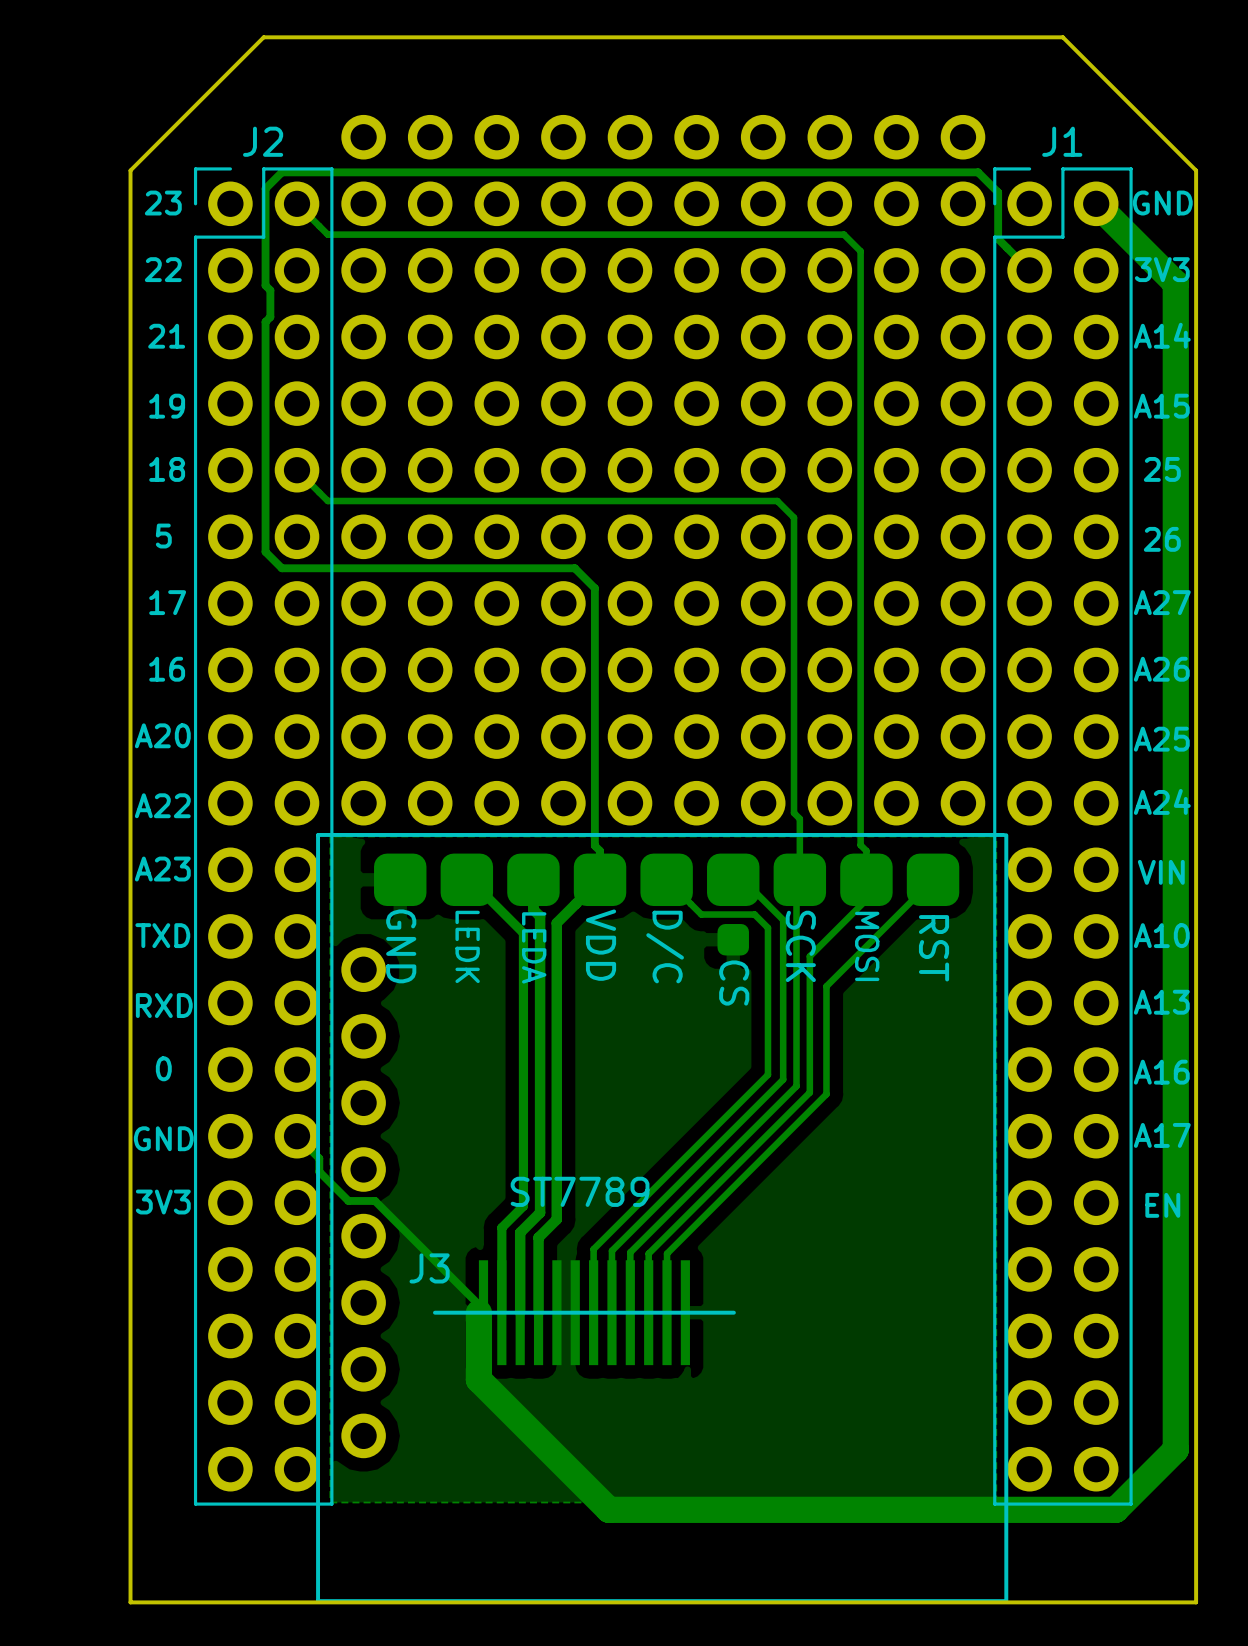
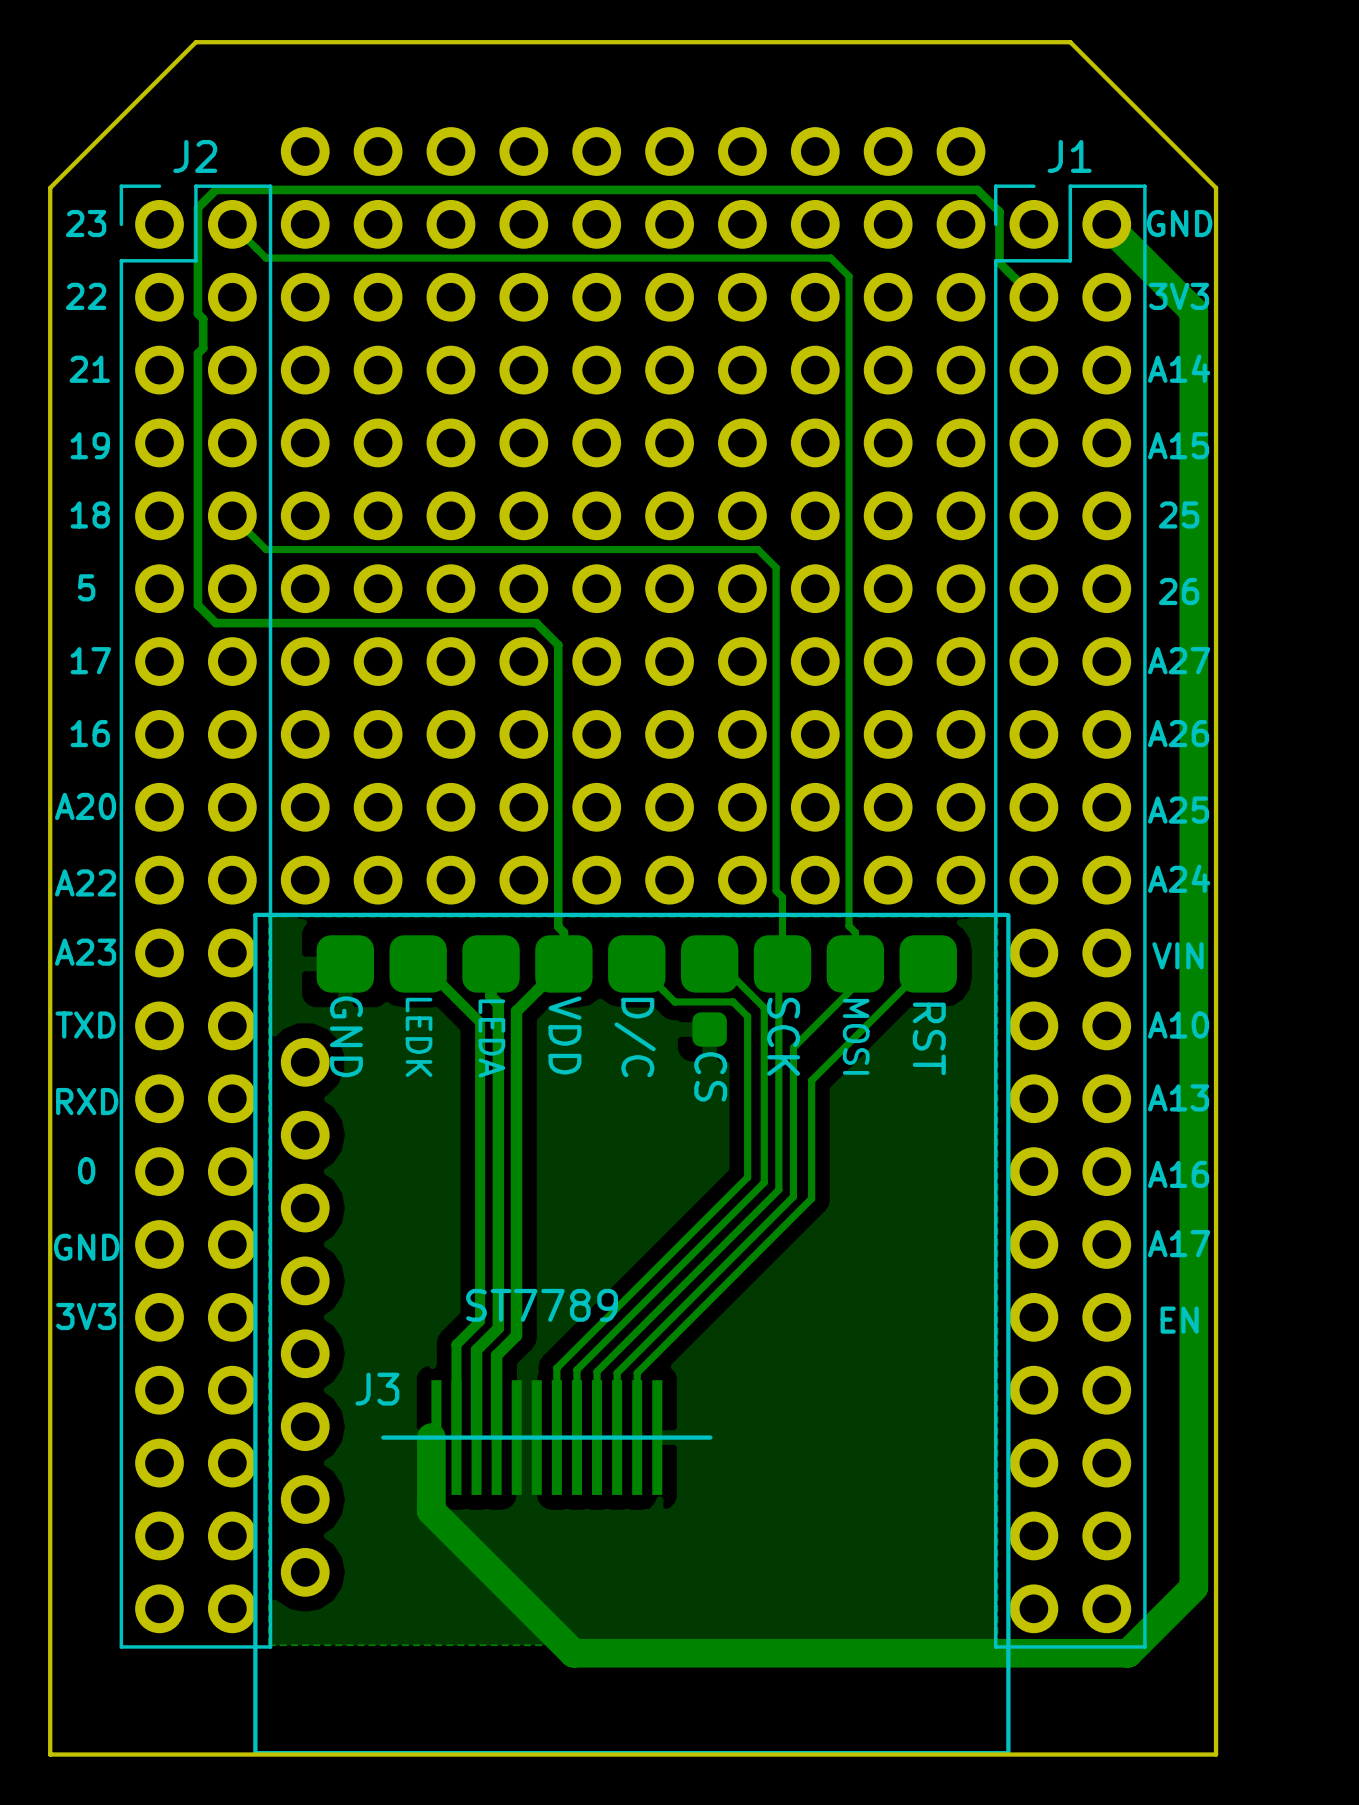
track: (297, 1136) (319, 1158) (319, 1171) (348, 1200) (375, 1200) (478, 1304) -> none

